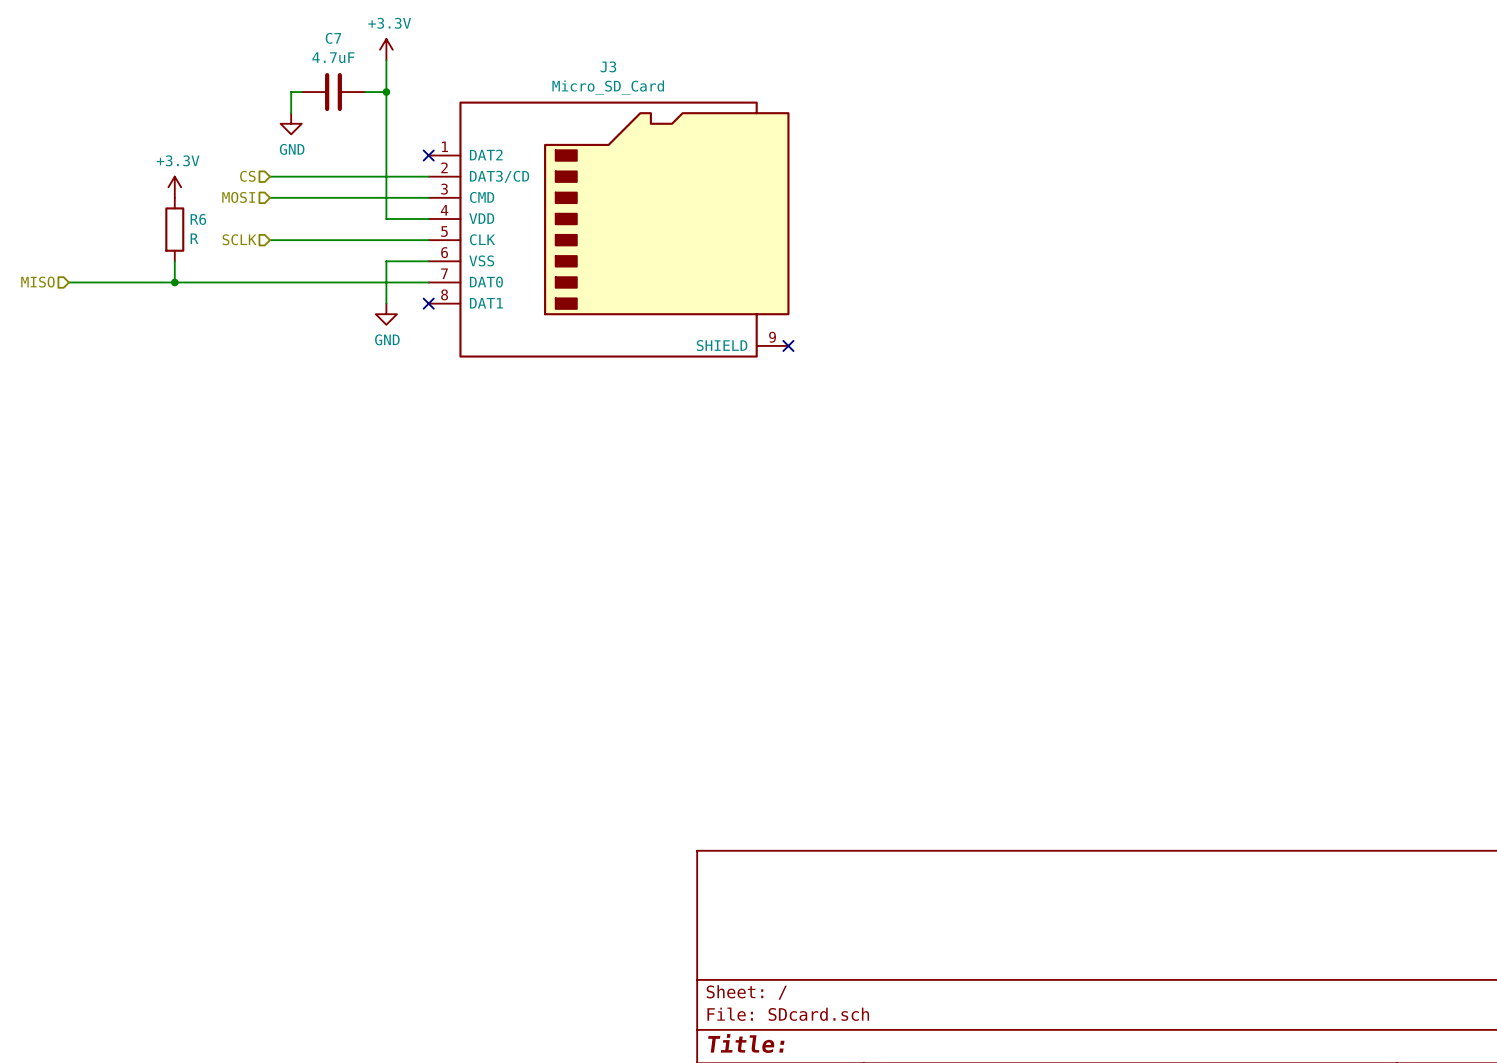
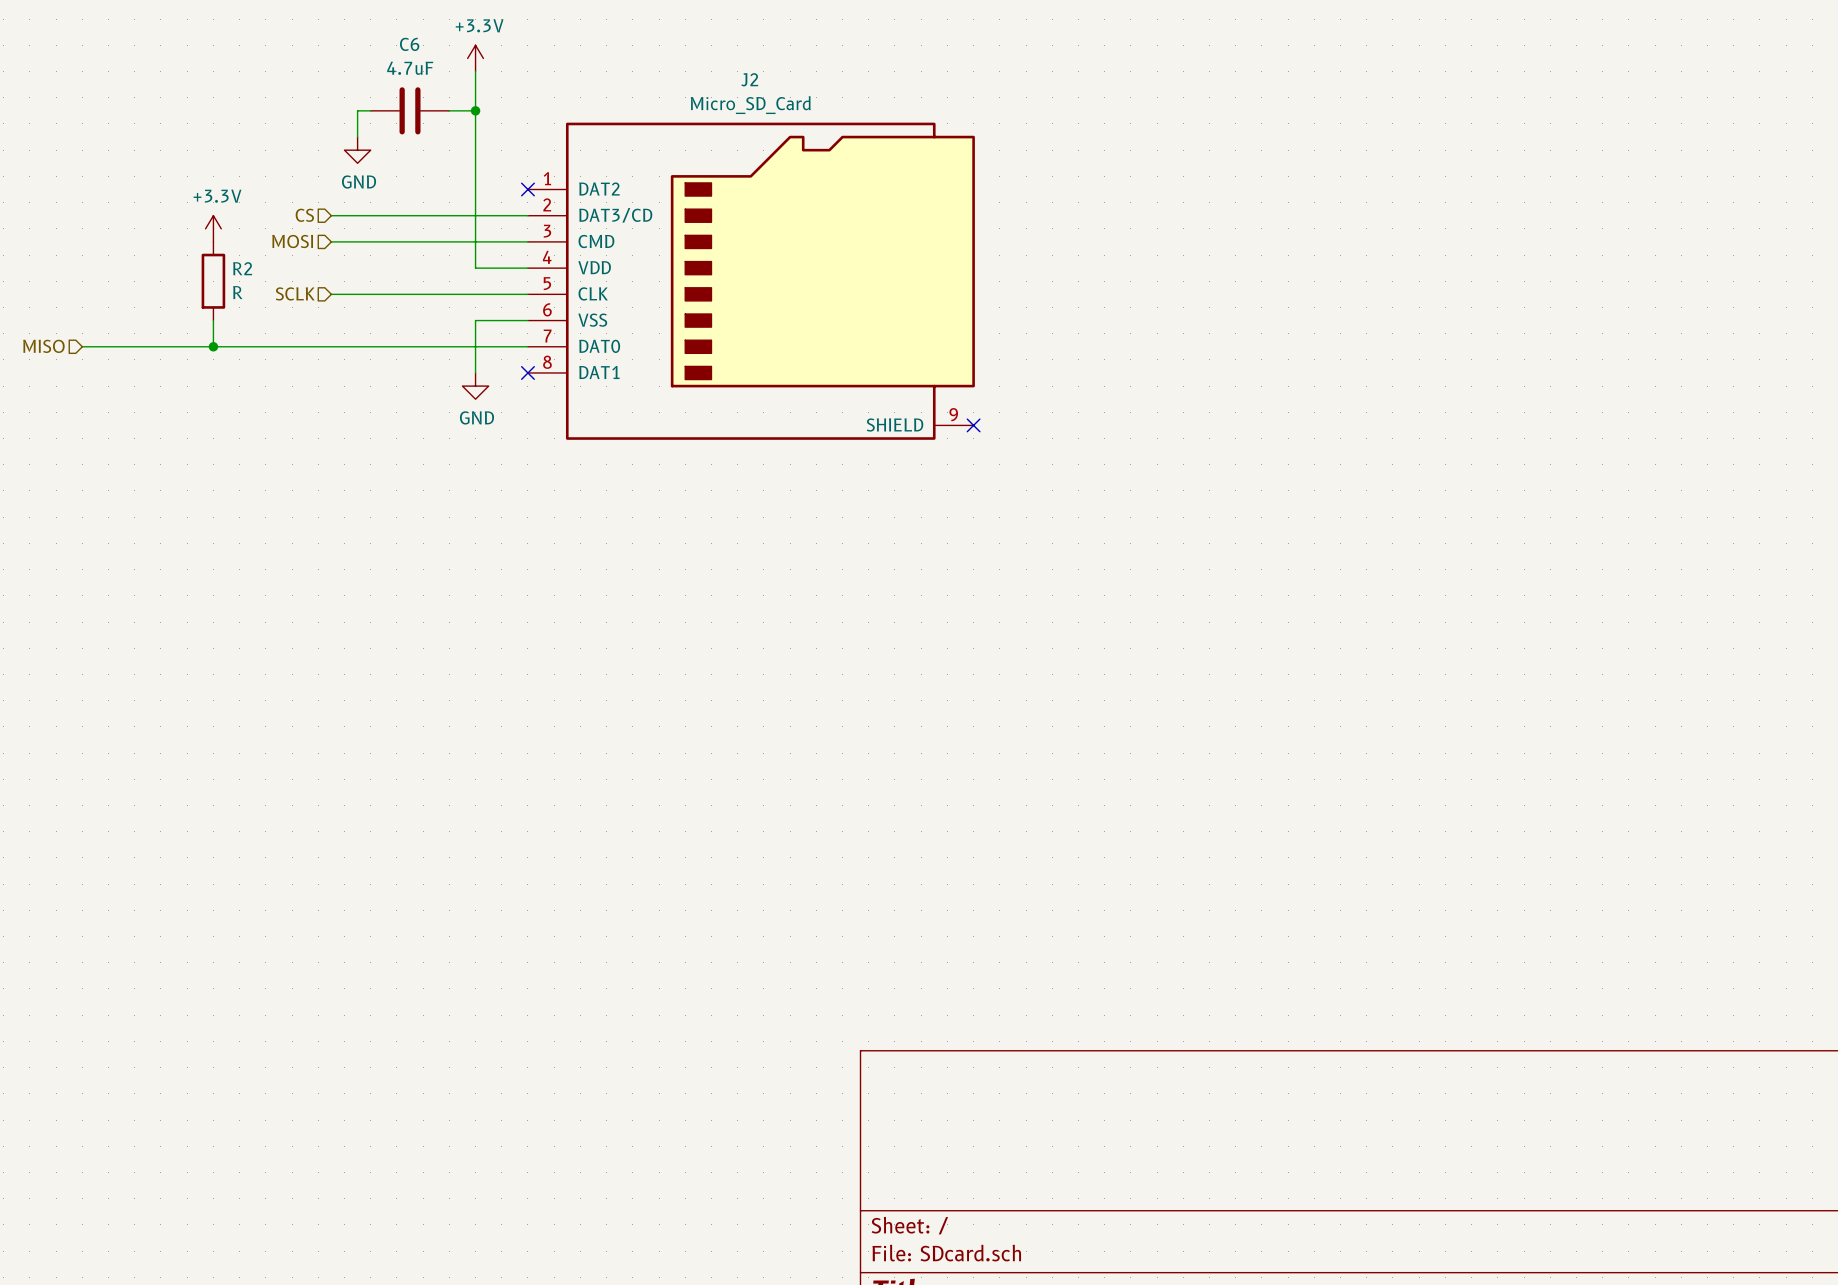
C7 name: C7 (333, 38) -> C6 (409, 44)
J3 name: J3 (608, 66) -> J2 (749, 79)
R6 name: R6 (198, 219) -> R2 (242, 268)

